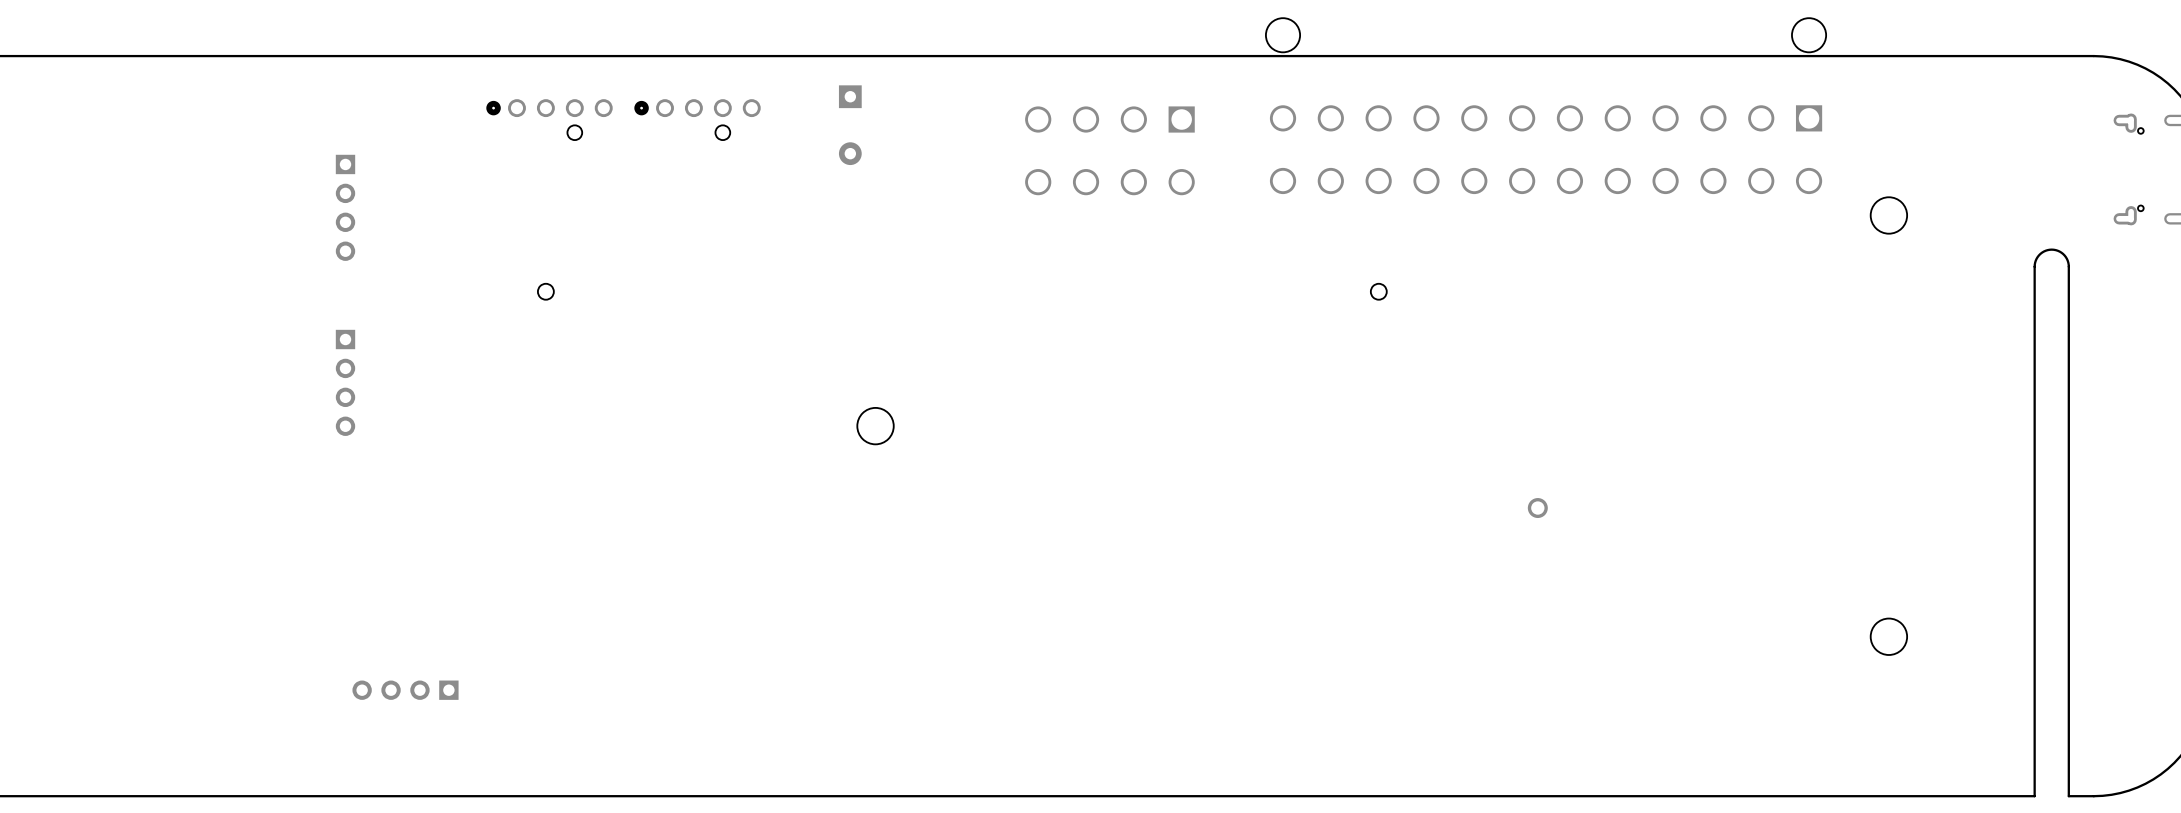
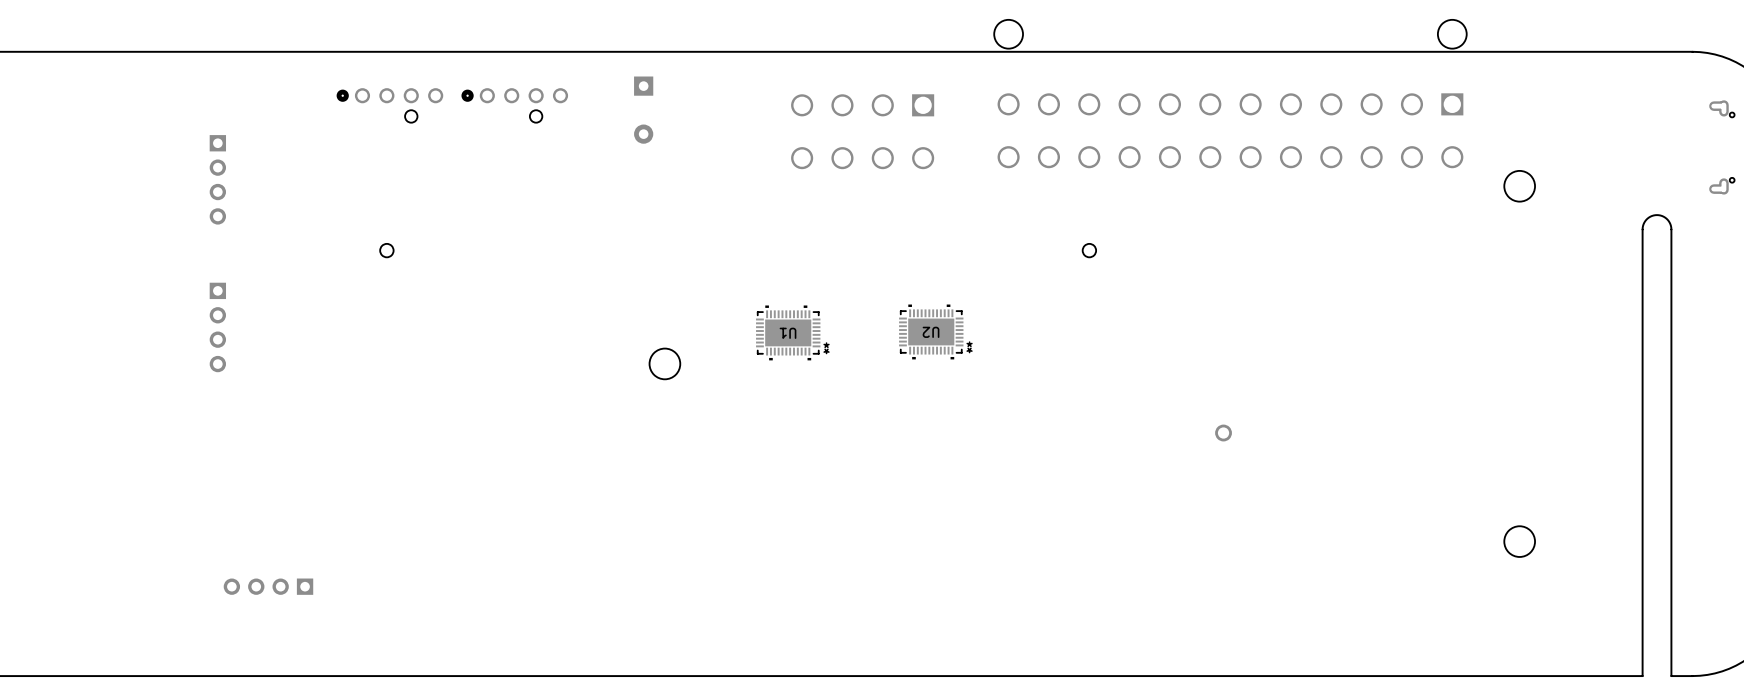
U2: none -> (931, 331)
U1: none -> (788, 332)

